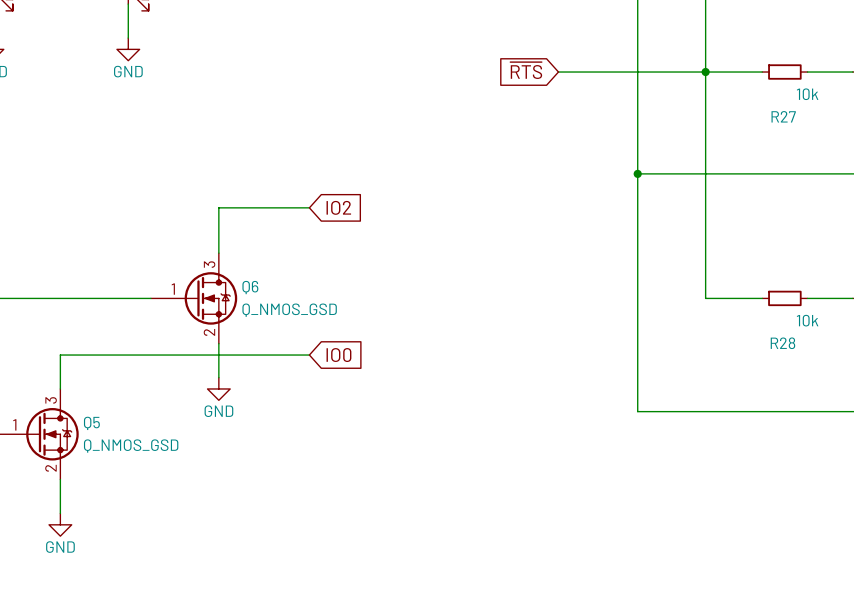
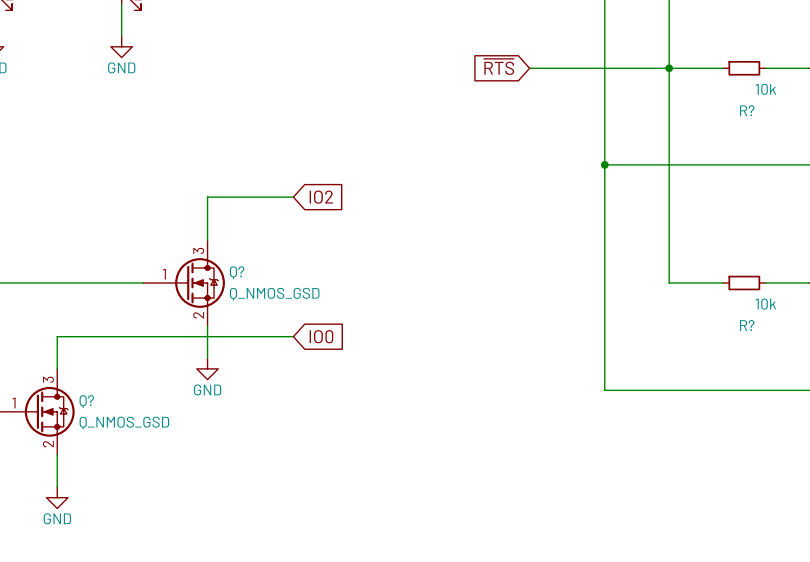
R27 name: R27 (783, 116) -> R? (747, 110)
Q6 name: Q6 (250, 287) -> Q? (237, 272)
R28 name: R28 (782, 343) -> R? (747, 325)
Q5 name: Q5 (91, 423) -> Q? (86, 401)

